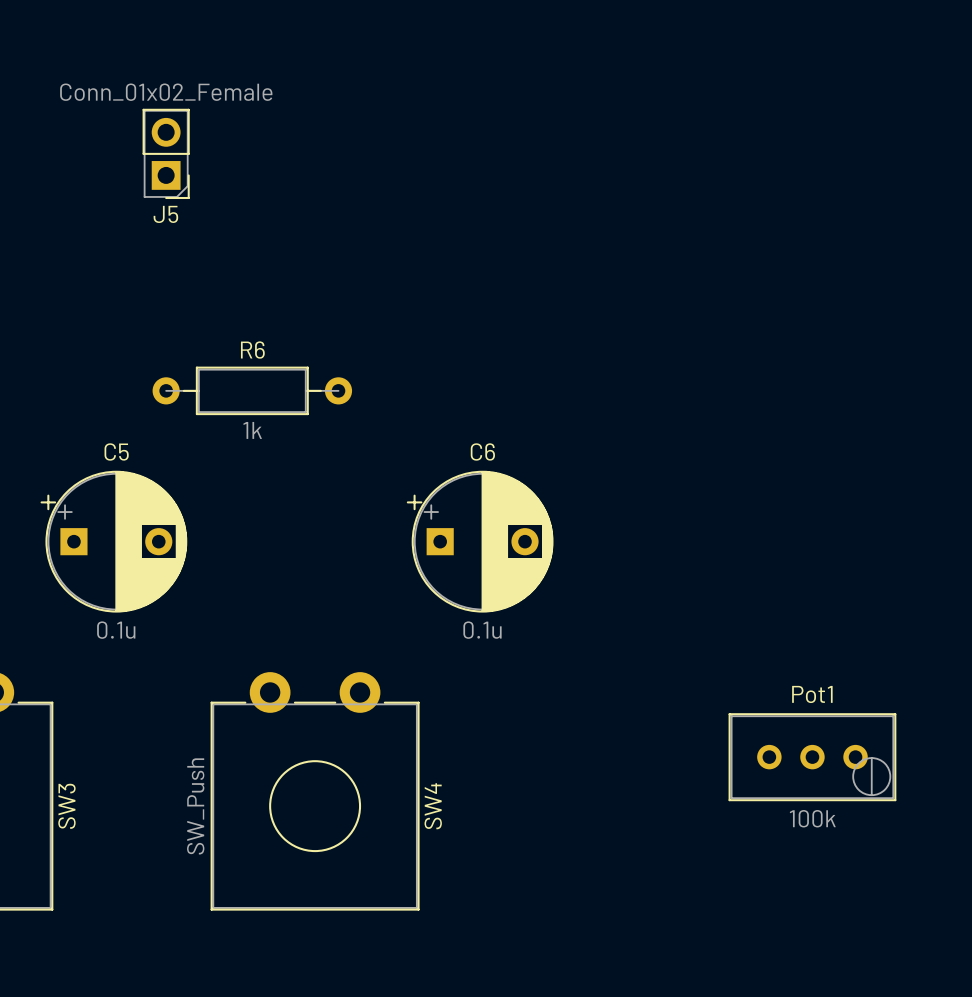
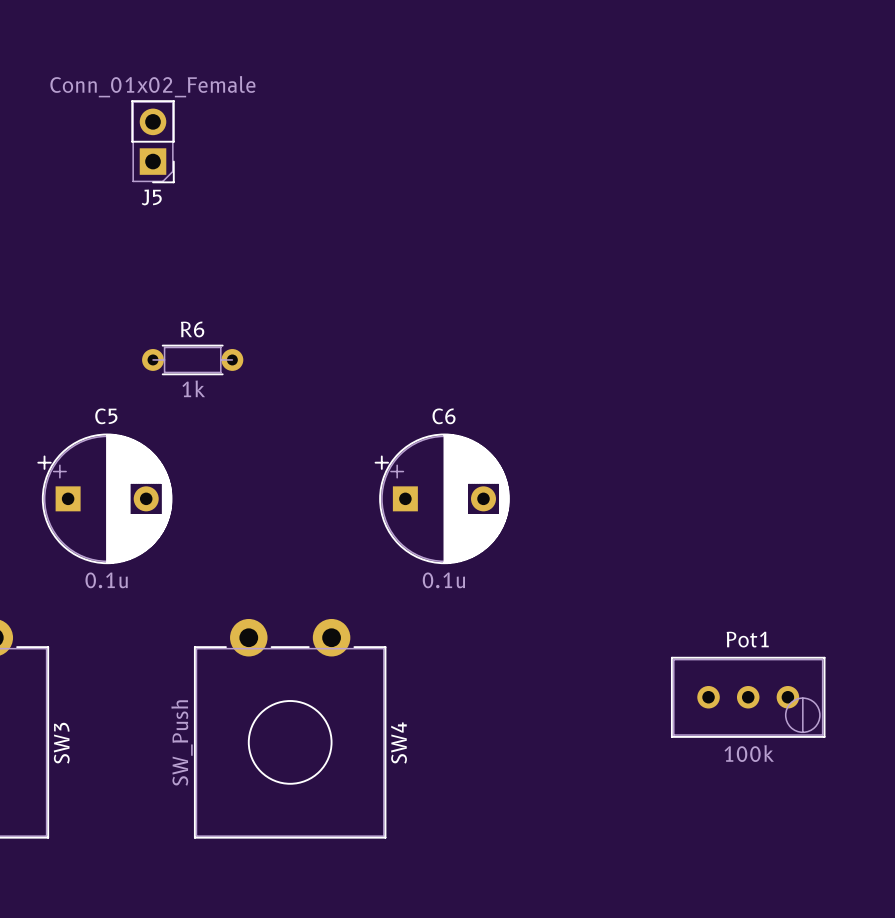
R6 footprint: [152, 366, 353, 416] -> [142, 344, 244, 376]

